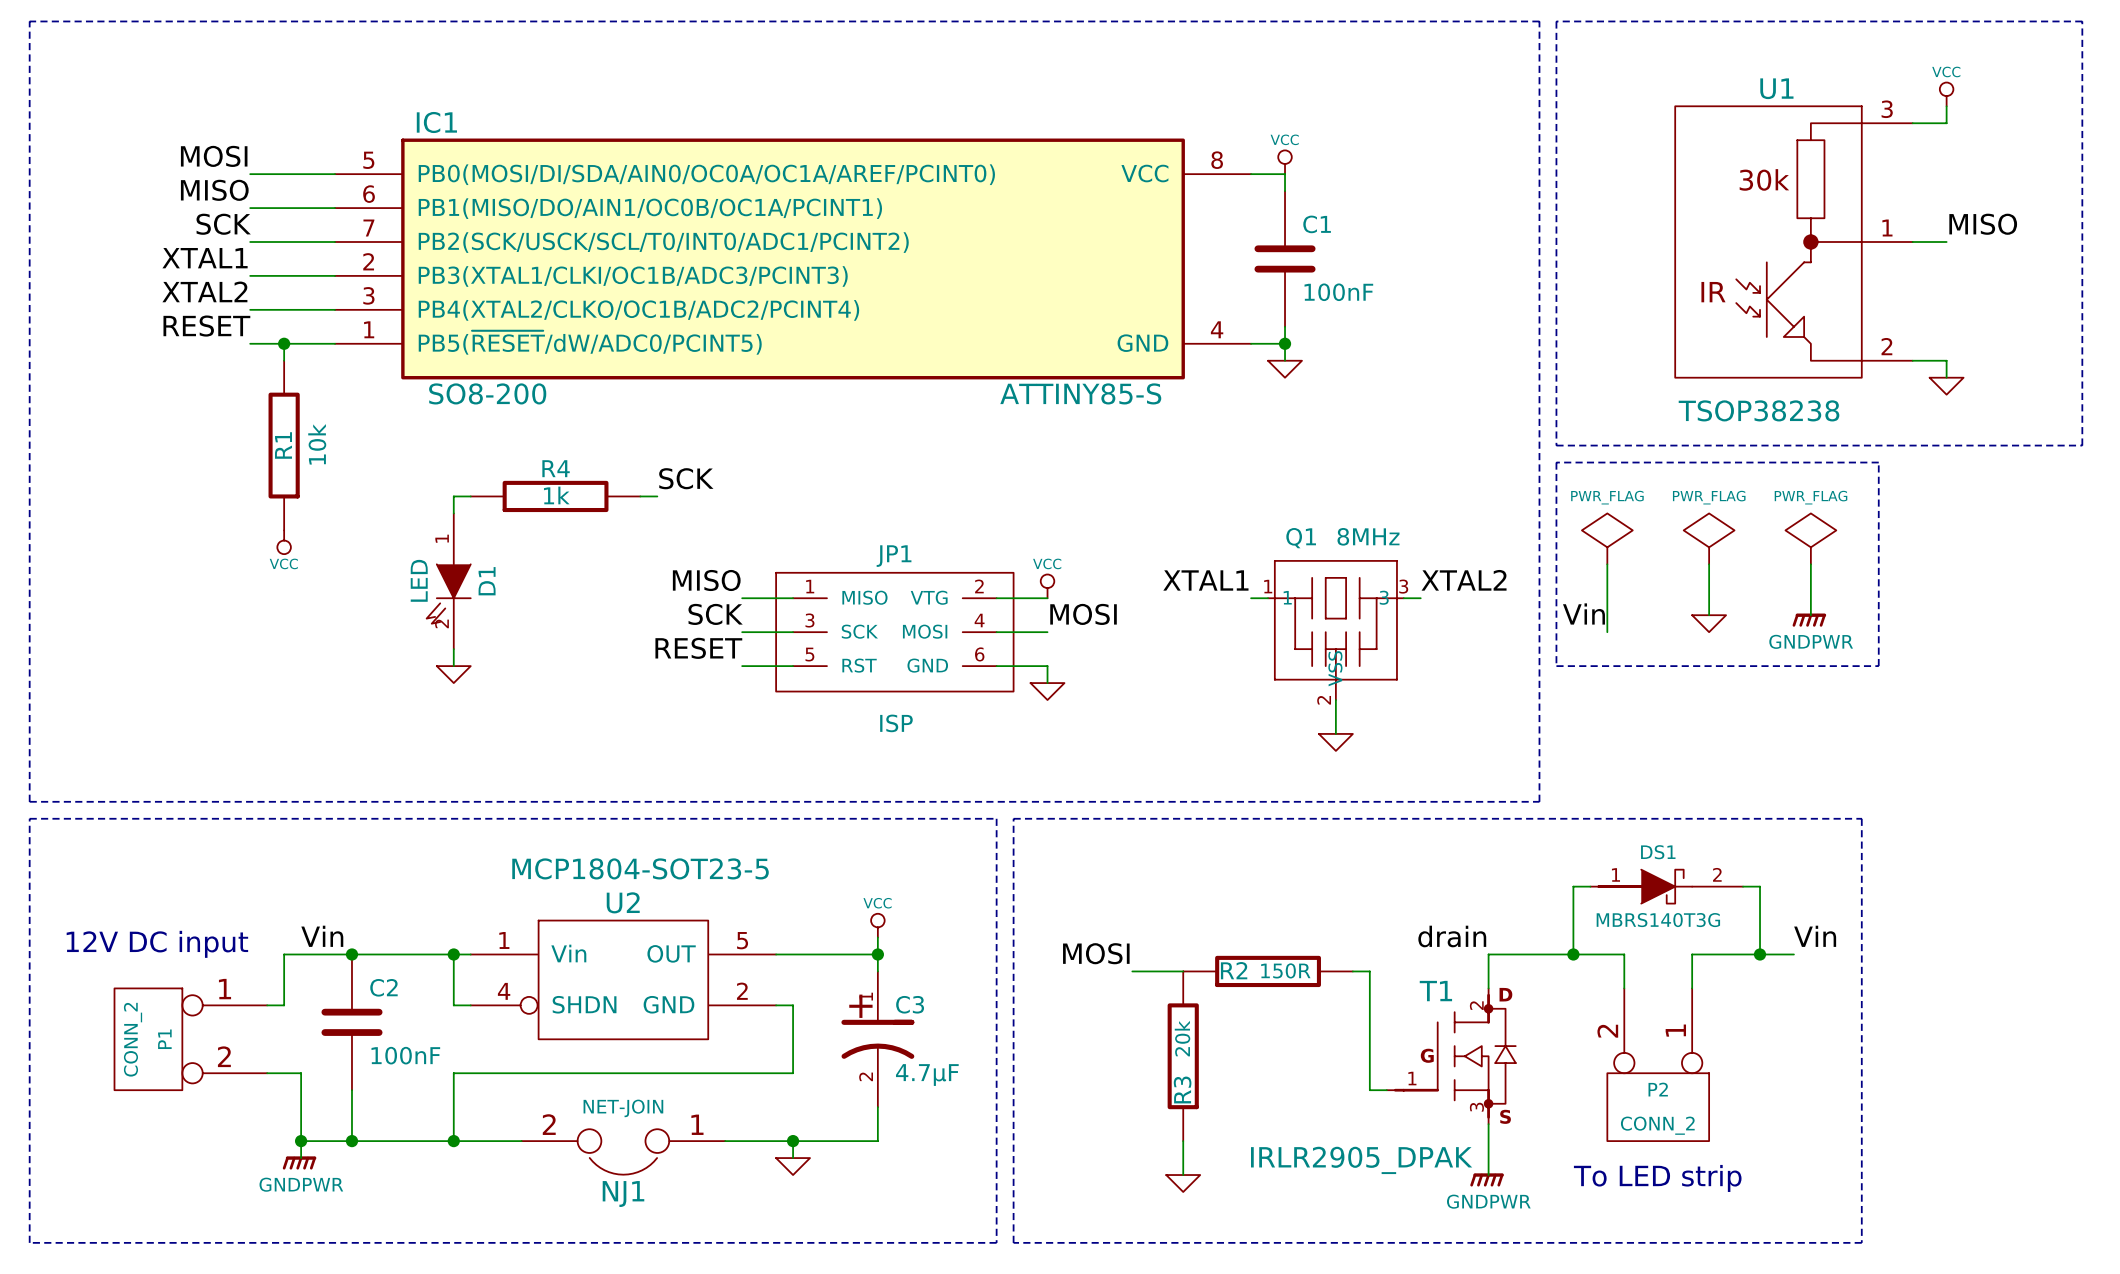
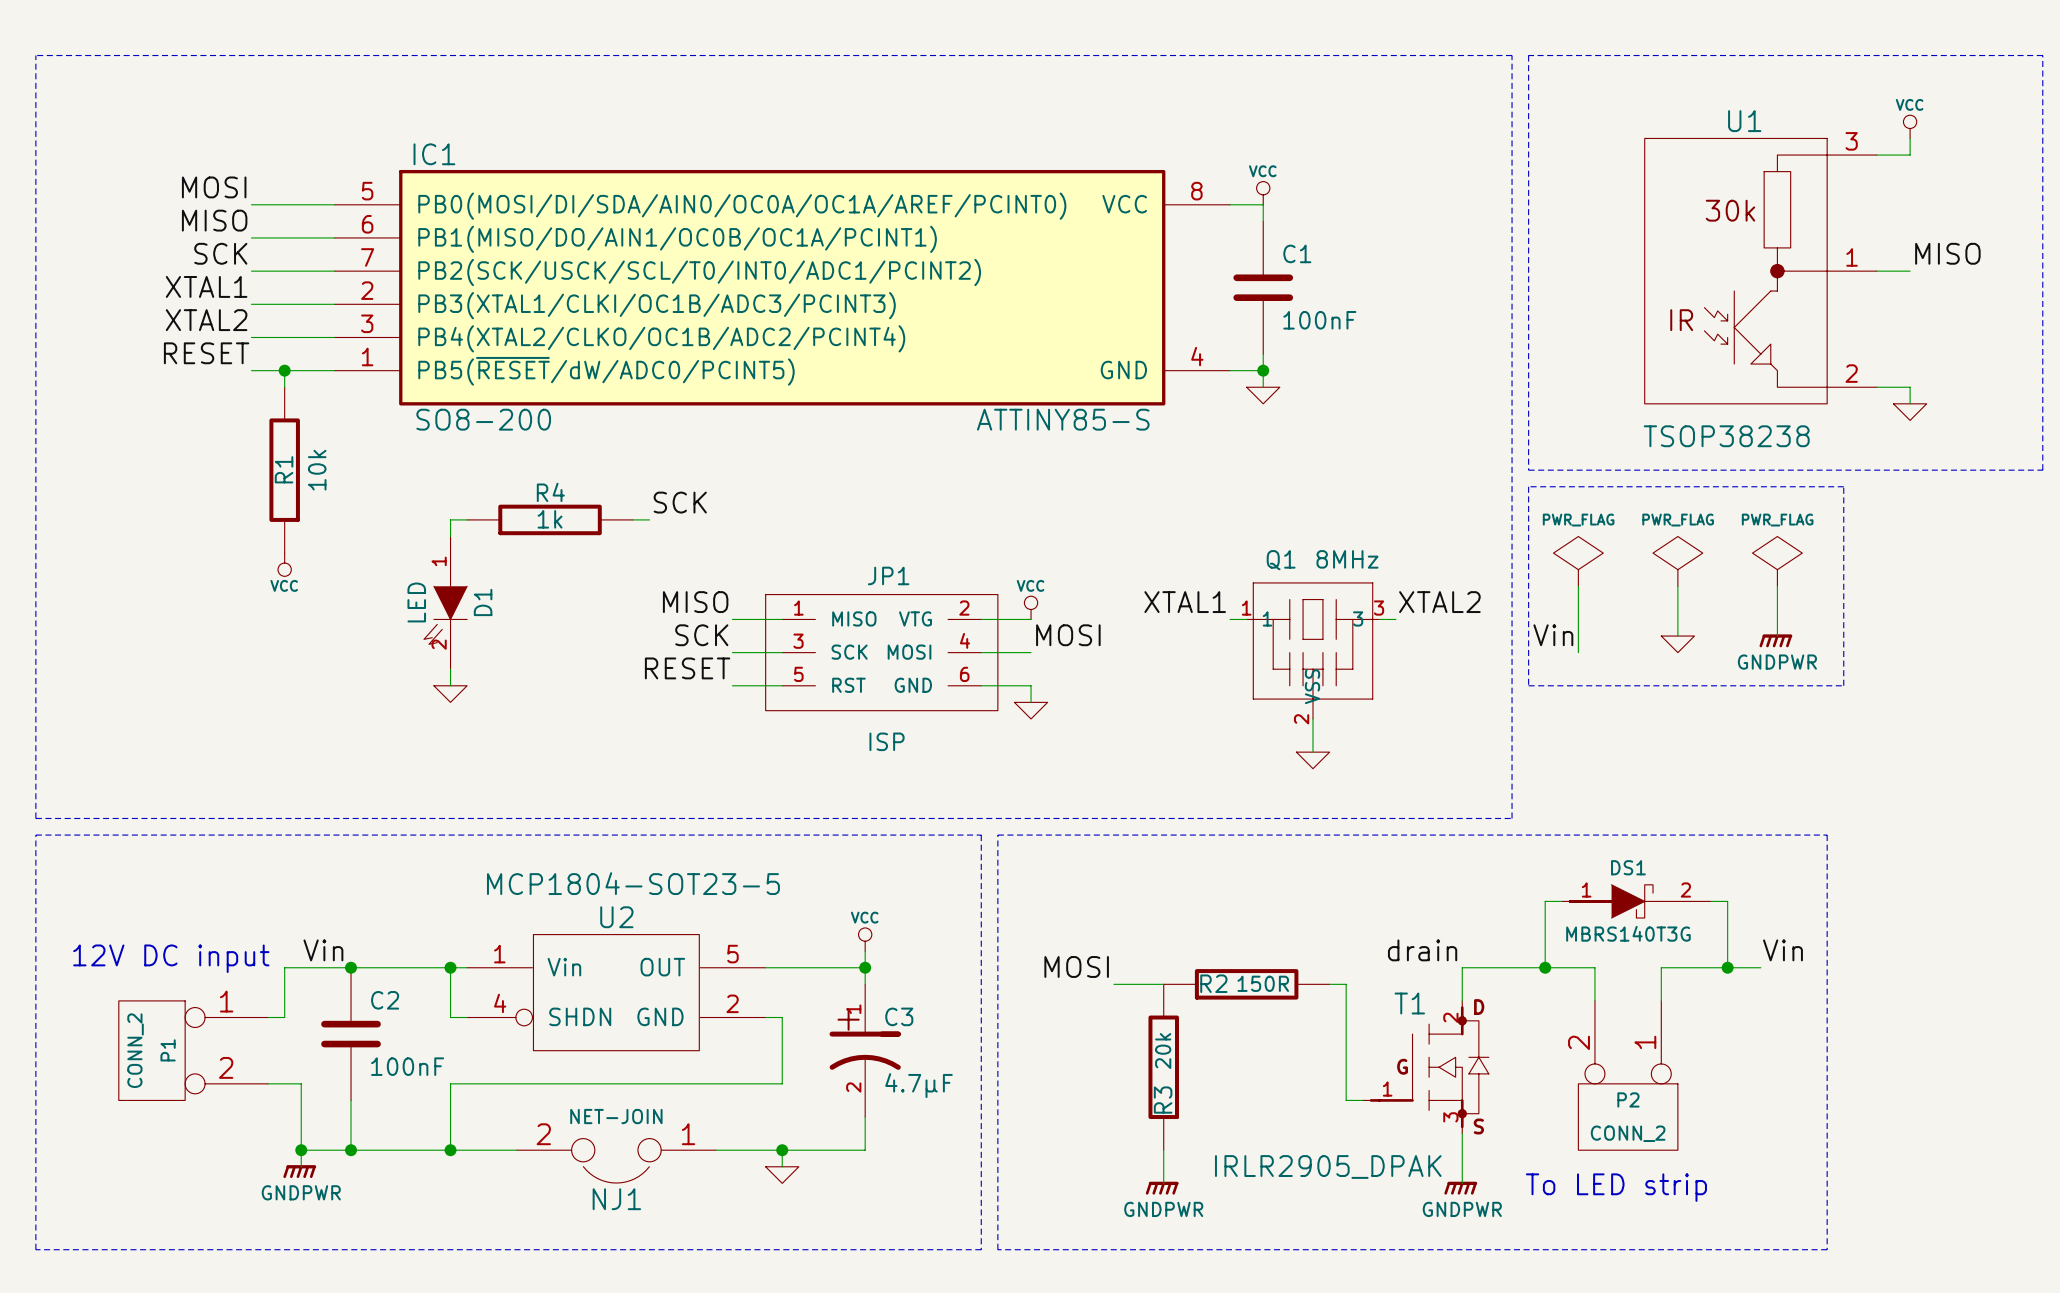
power symbol shape: [1166, 1175, 1201, 1192] -> [1145, 1181, 1179, 1195]
power symbol text: none -> GNDPWR (1163, 1209)

